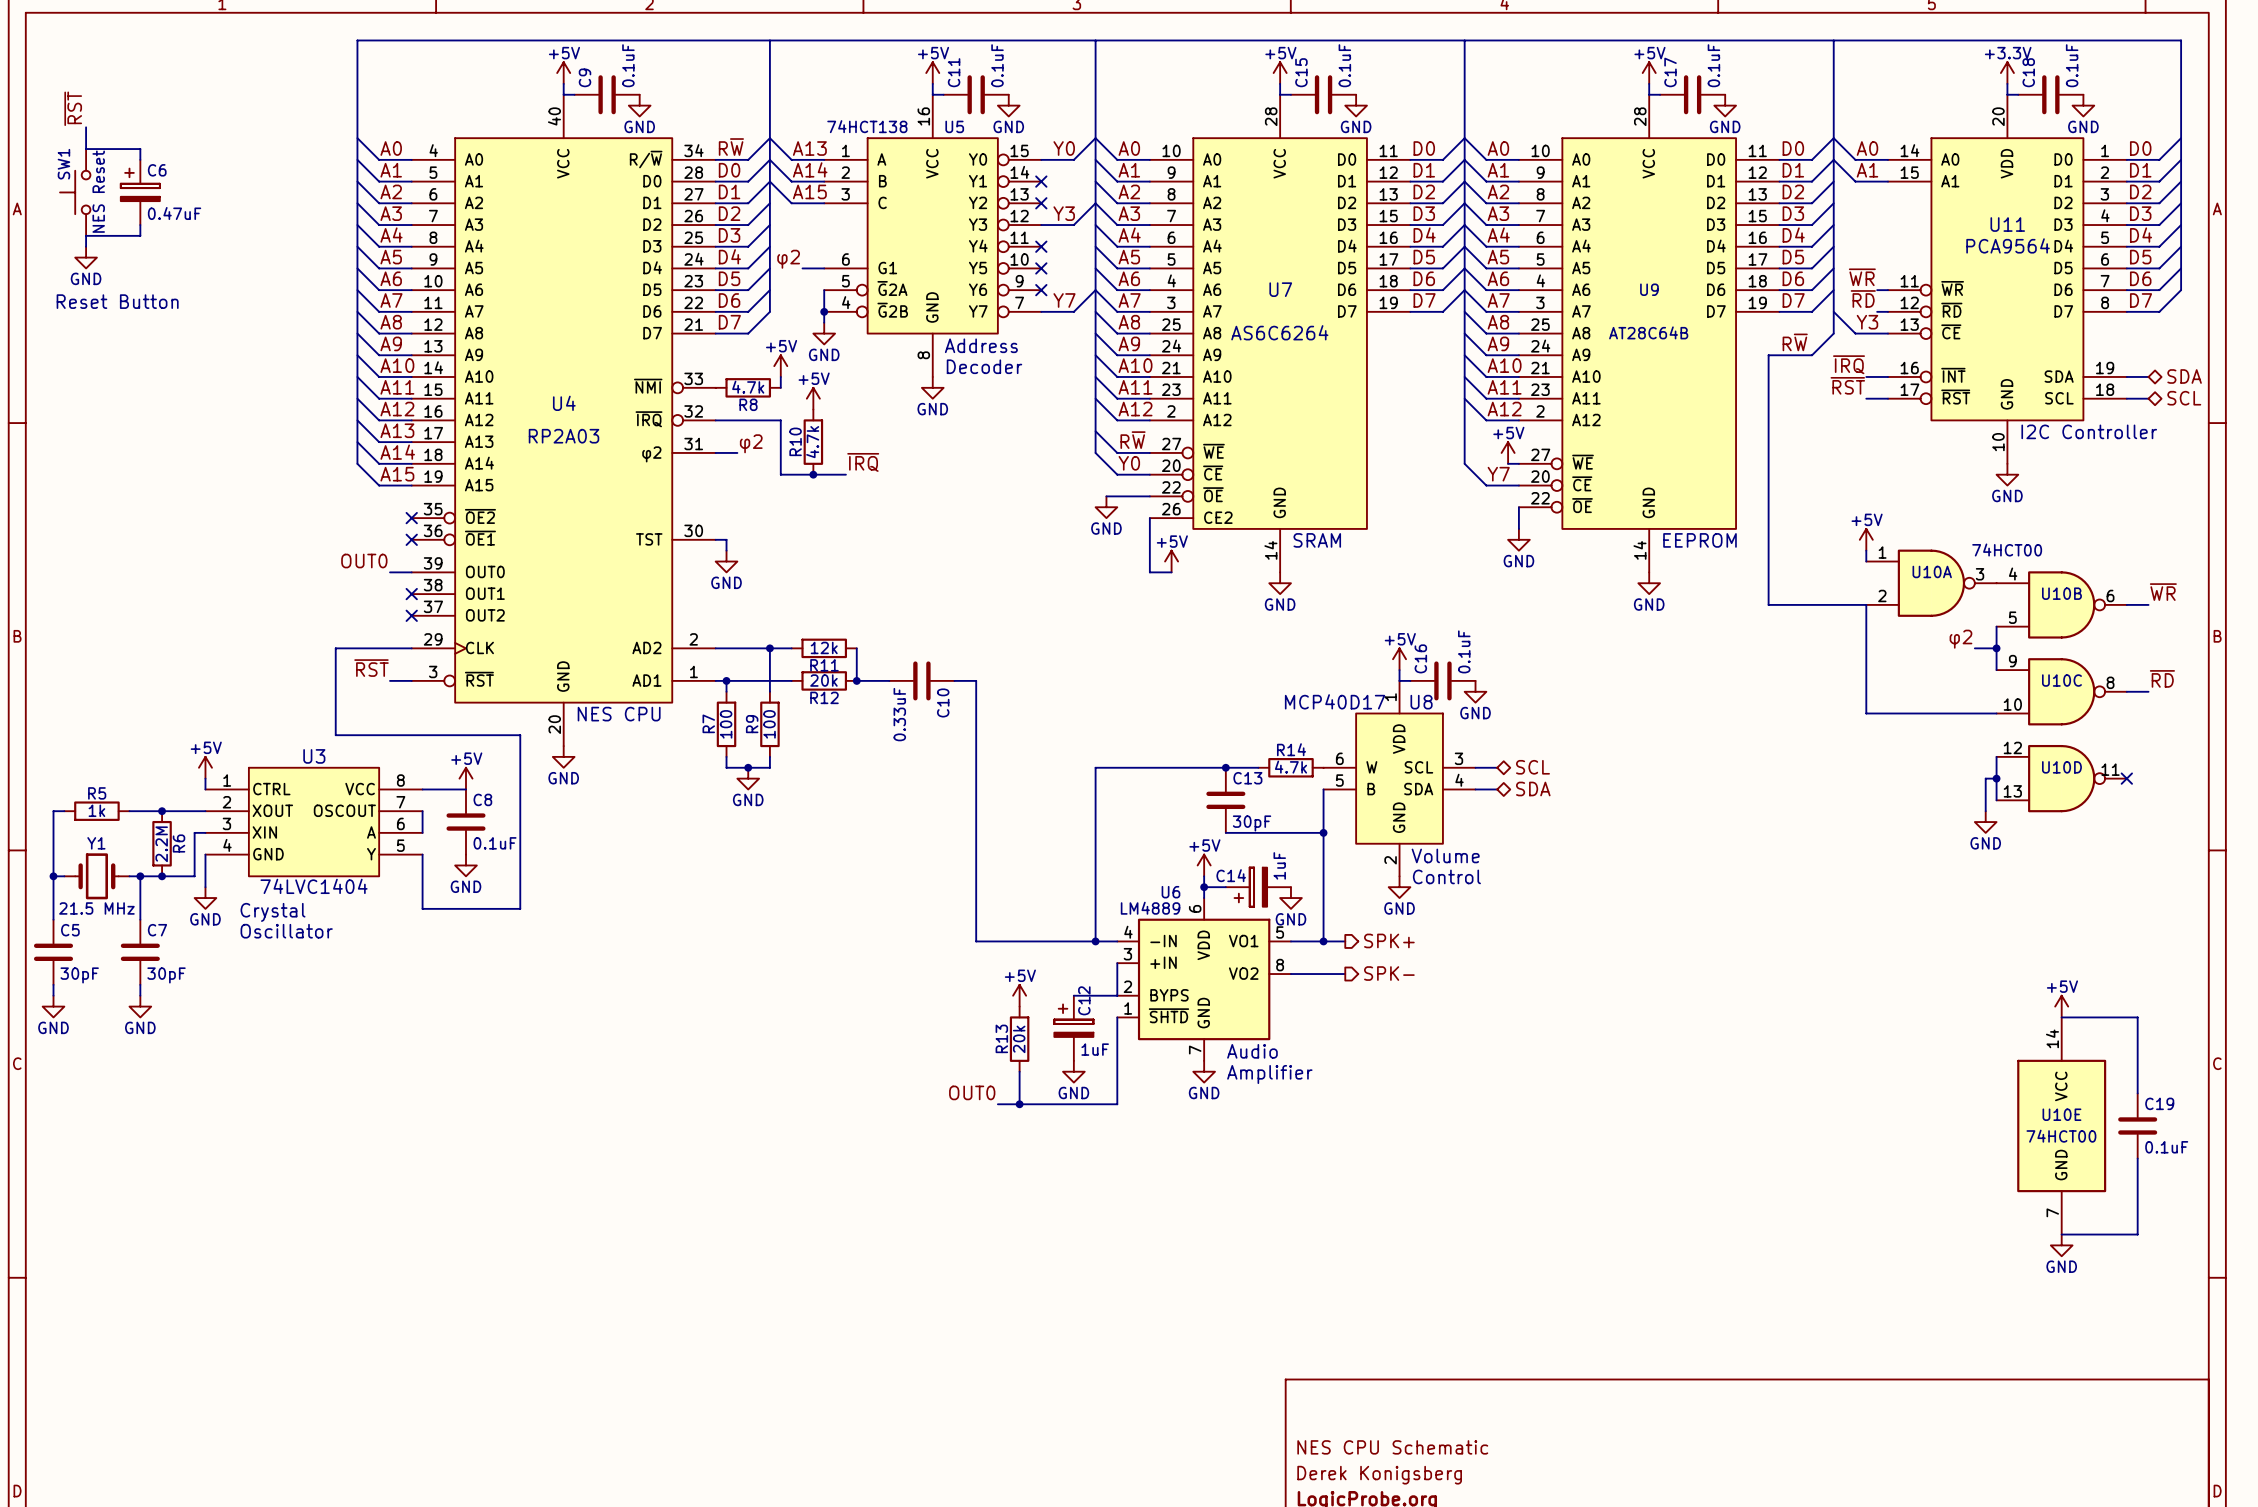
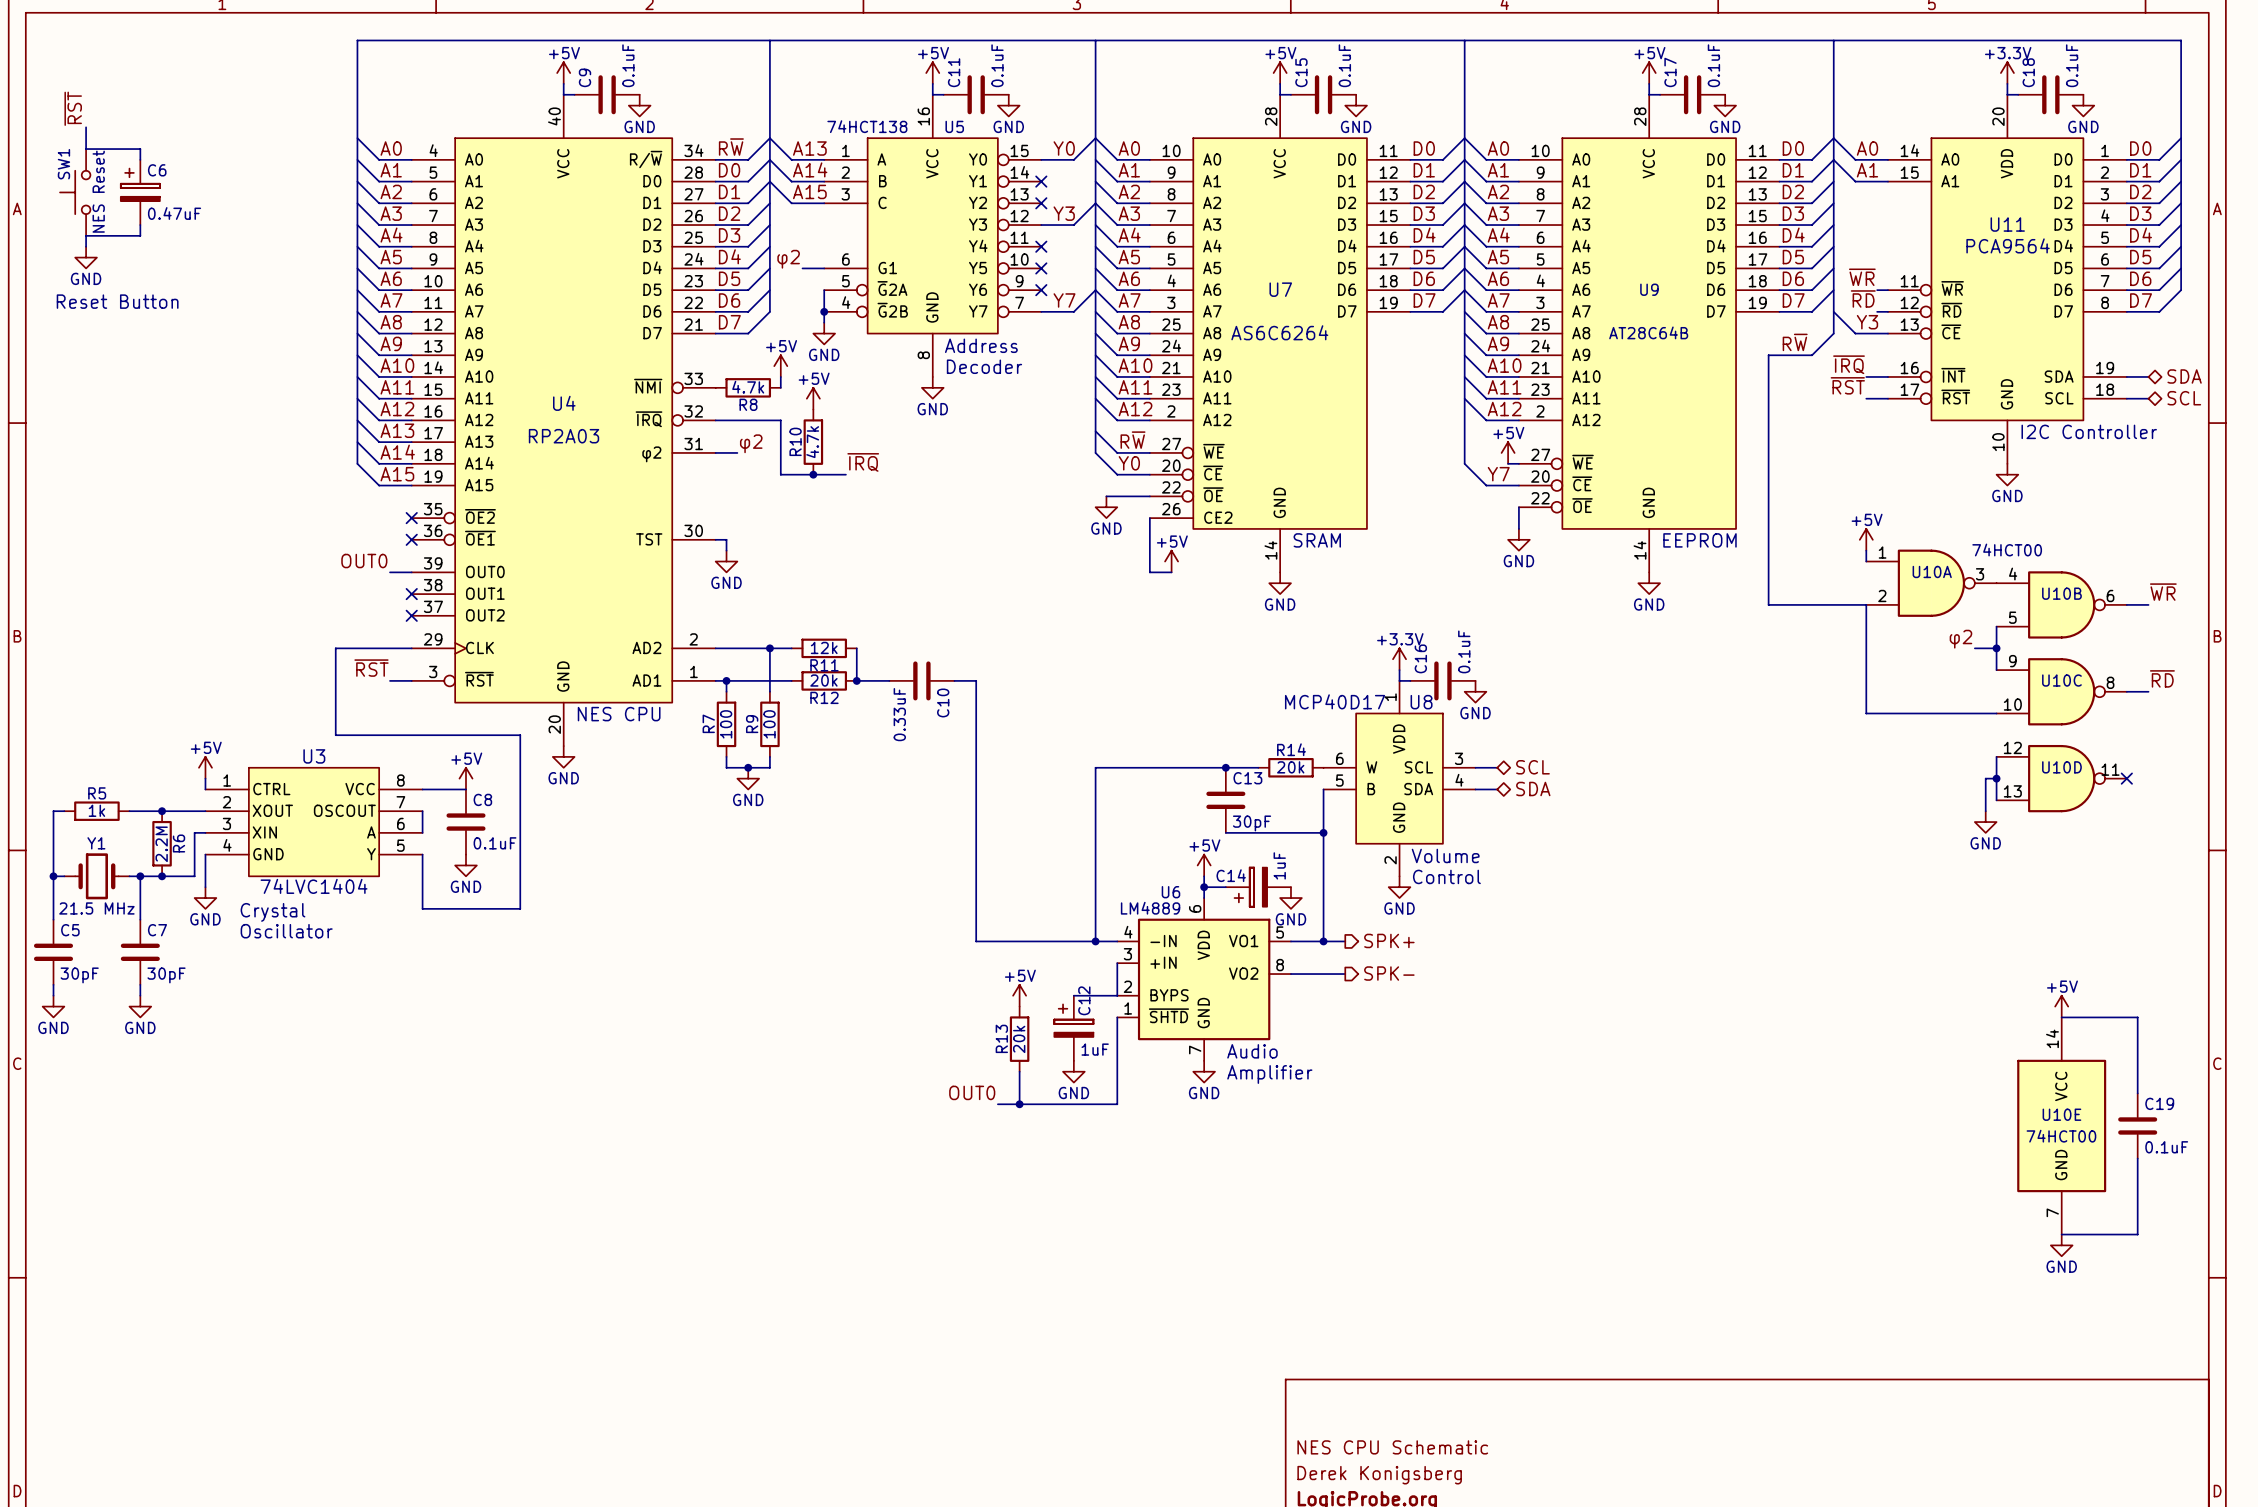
power symbol: +5V (1399, 659) -> +3.3V (1399, 659)
R14 value: 4.7k (1290, 767) -> 20k (1290, 767)

